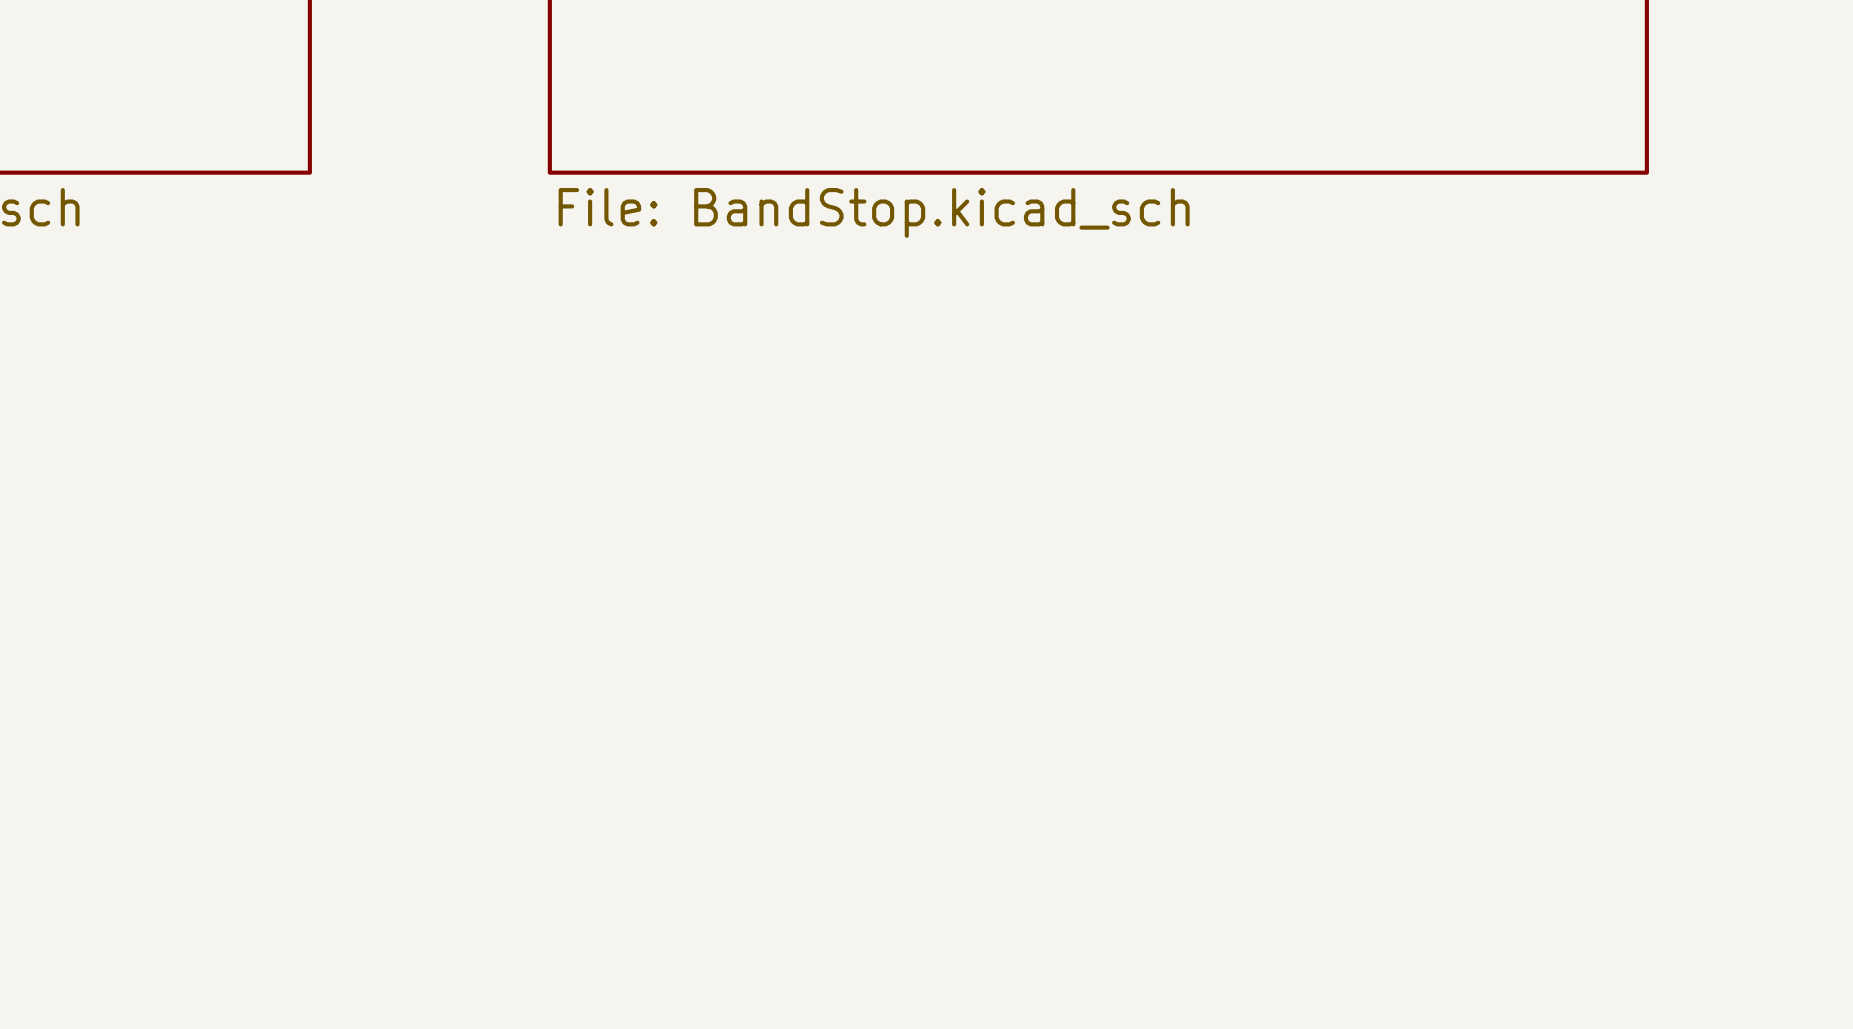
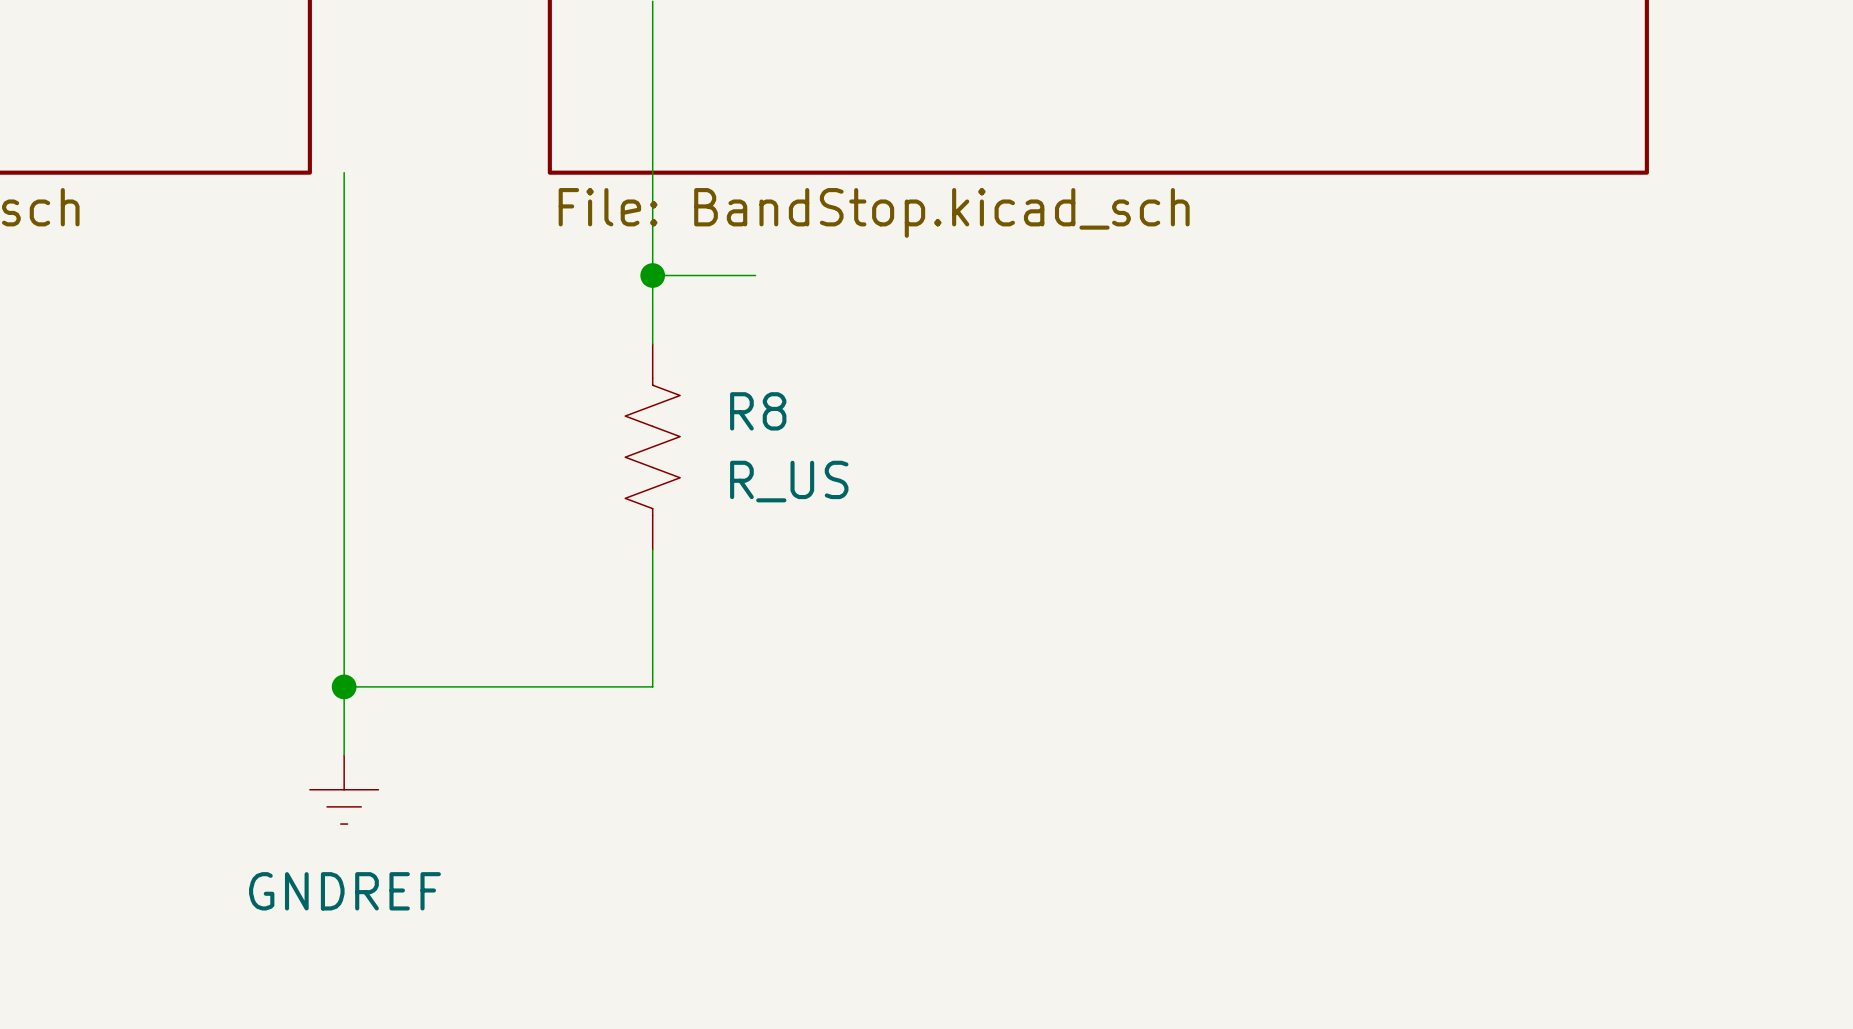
wire: none -> (652, 1) (652, 344)
wire: none -> (344, 172) (344, 755)
wire: none -> (652, 275) (755, 275)
junction: none -> (652, 275)
R8: none -> R_US (652, 446)
wire: none -> (652, 549) (652, 686) (344, 686)
junction: none -> (344, 686)
power symbol: none -> GNDREF (344, 789)

